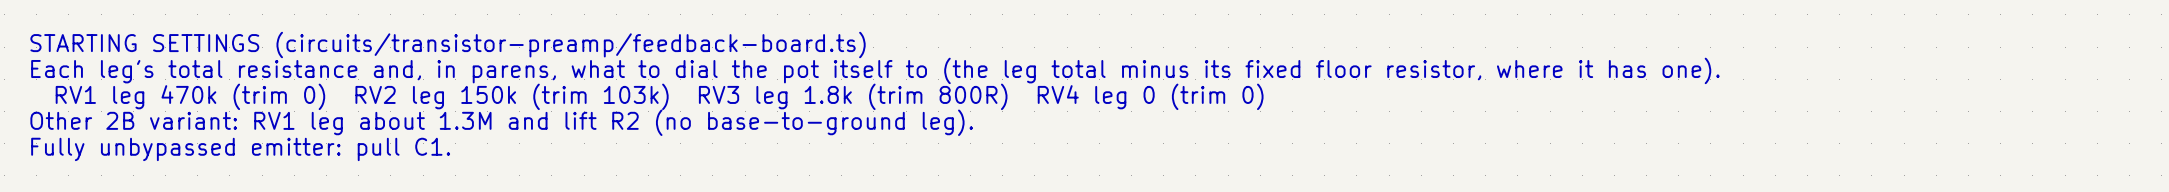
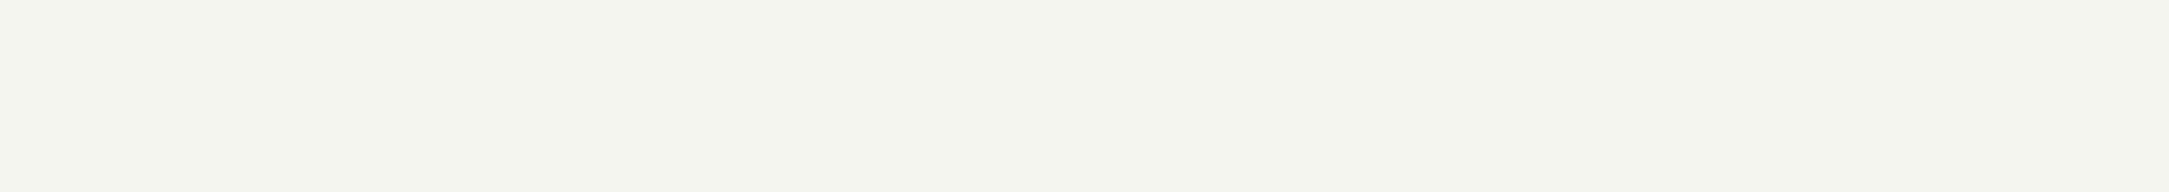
text: STARTING SETTINGS (circuits/transistor-preamp/feedback-board.ts) (448, 45) -> none
text: Each leg's total resistance and, in parens, what to dial the pot itself to (the leg total minus its fixed floor resistor, where it has one). (875, 70) -> none
text: RV1 leg 470k (trim 0) RV2 leg 150k (trim 103k) RV3 leg 1.8k (trim 800R) RV4 leg 0 (trim 0) (659, 96) -> none
text: Other 2B variant: RV1 leg about 1.3M and lift R2 (no base-to-ground leg). (501, 122) -> none
text: Fully unbypassed emitter: pull C1. (240, 149) -> none

